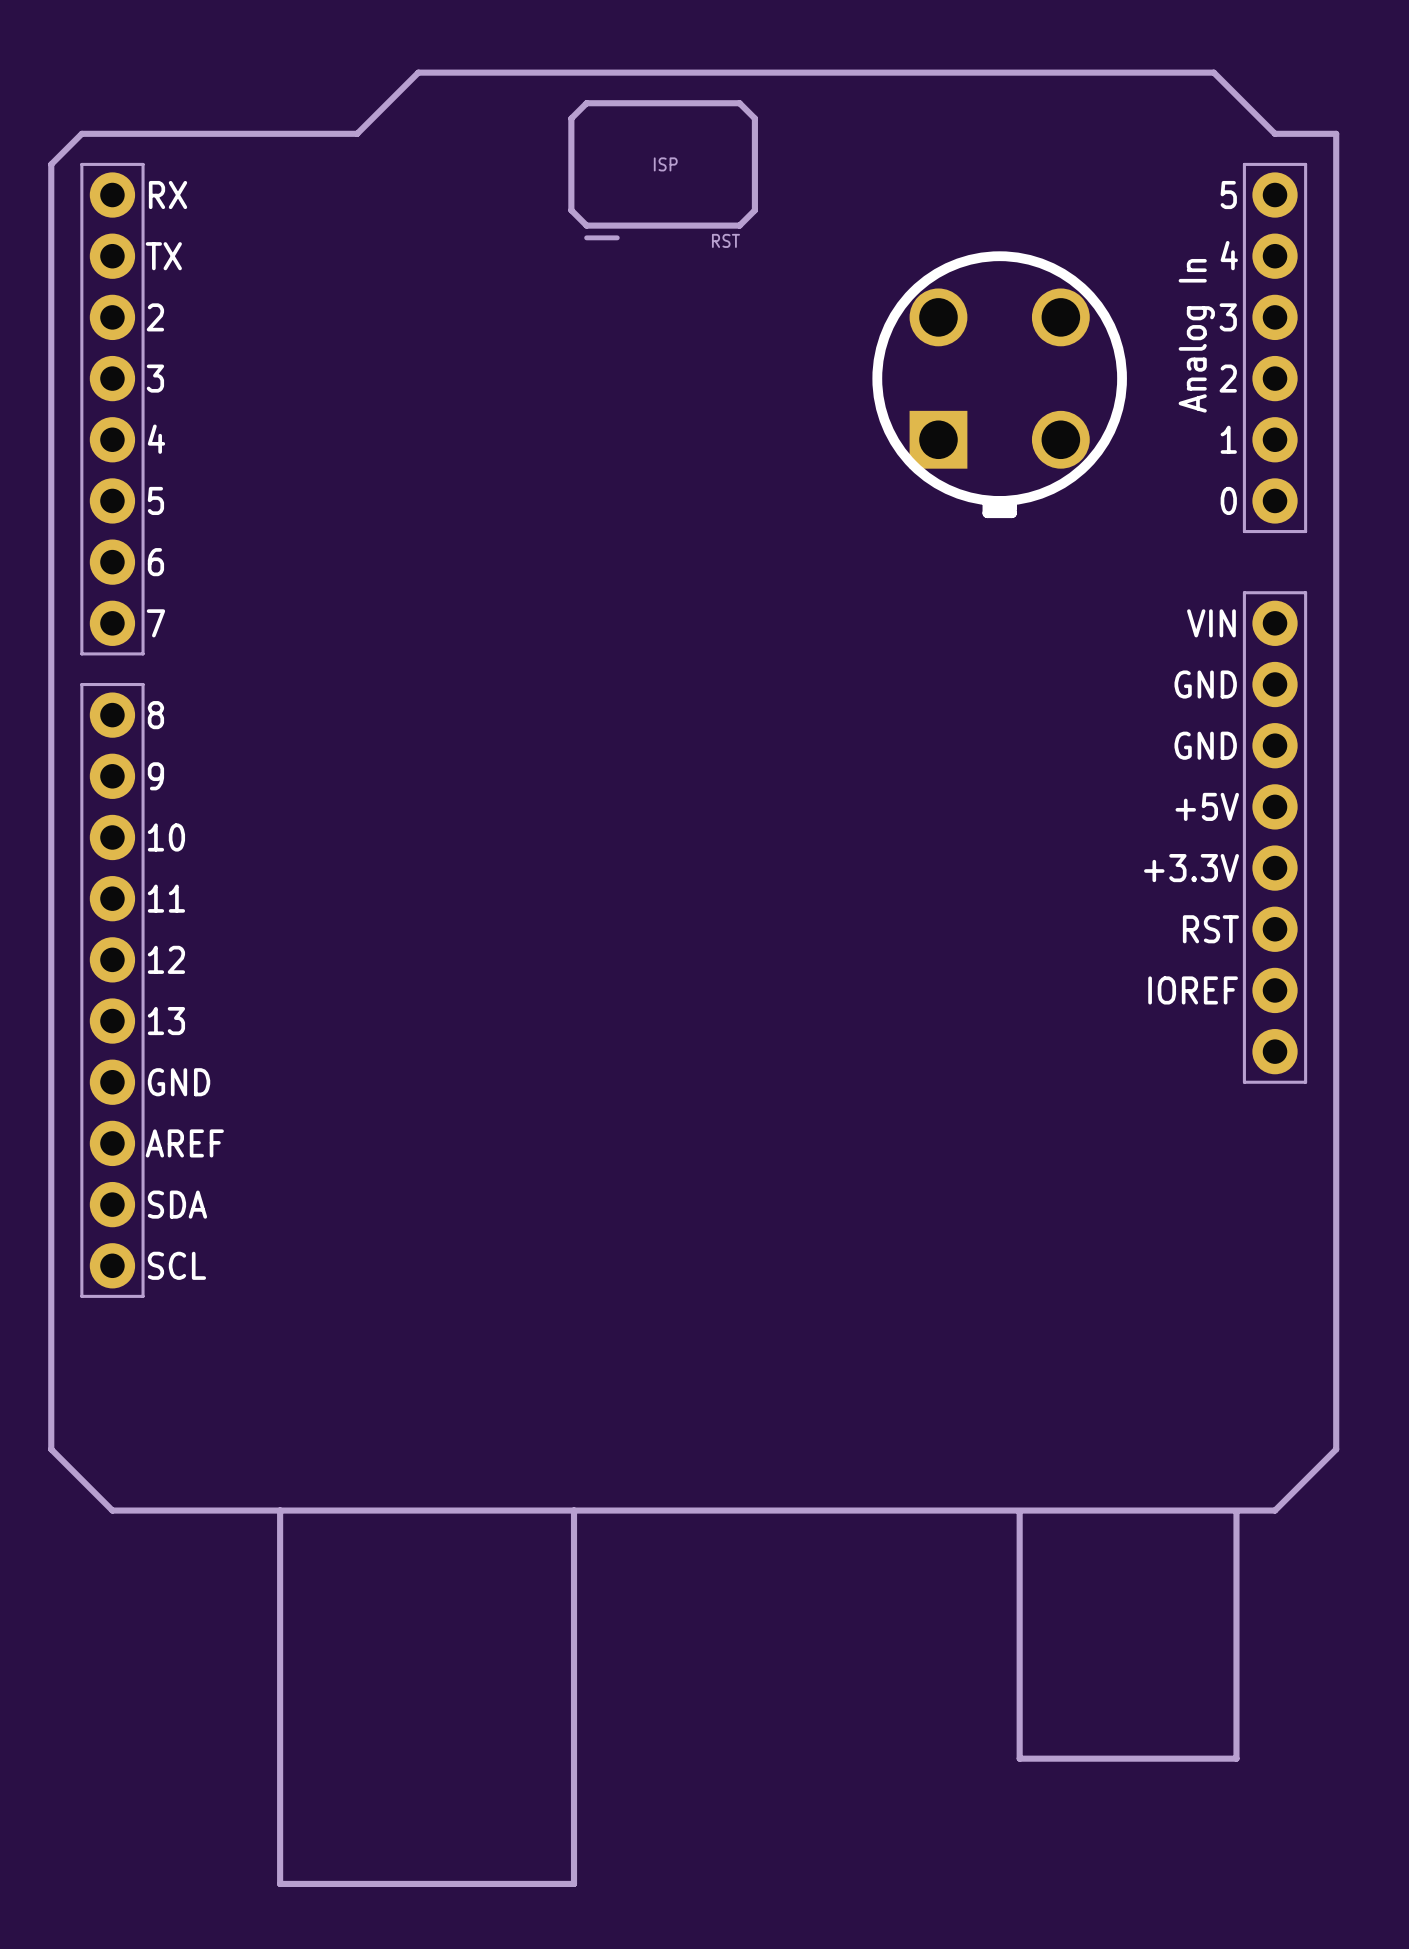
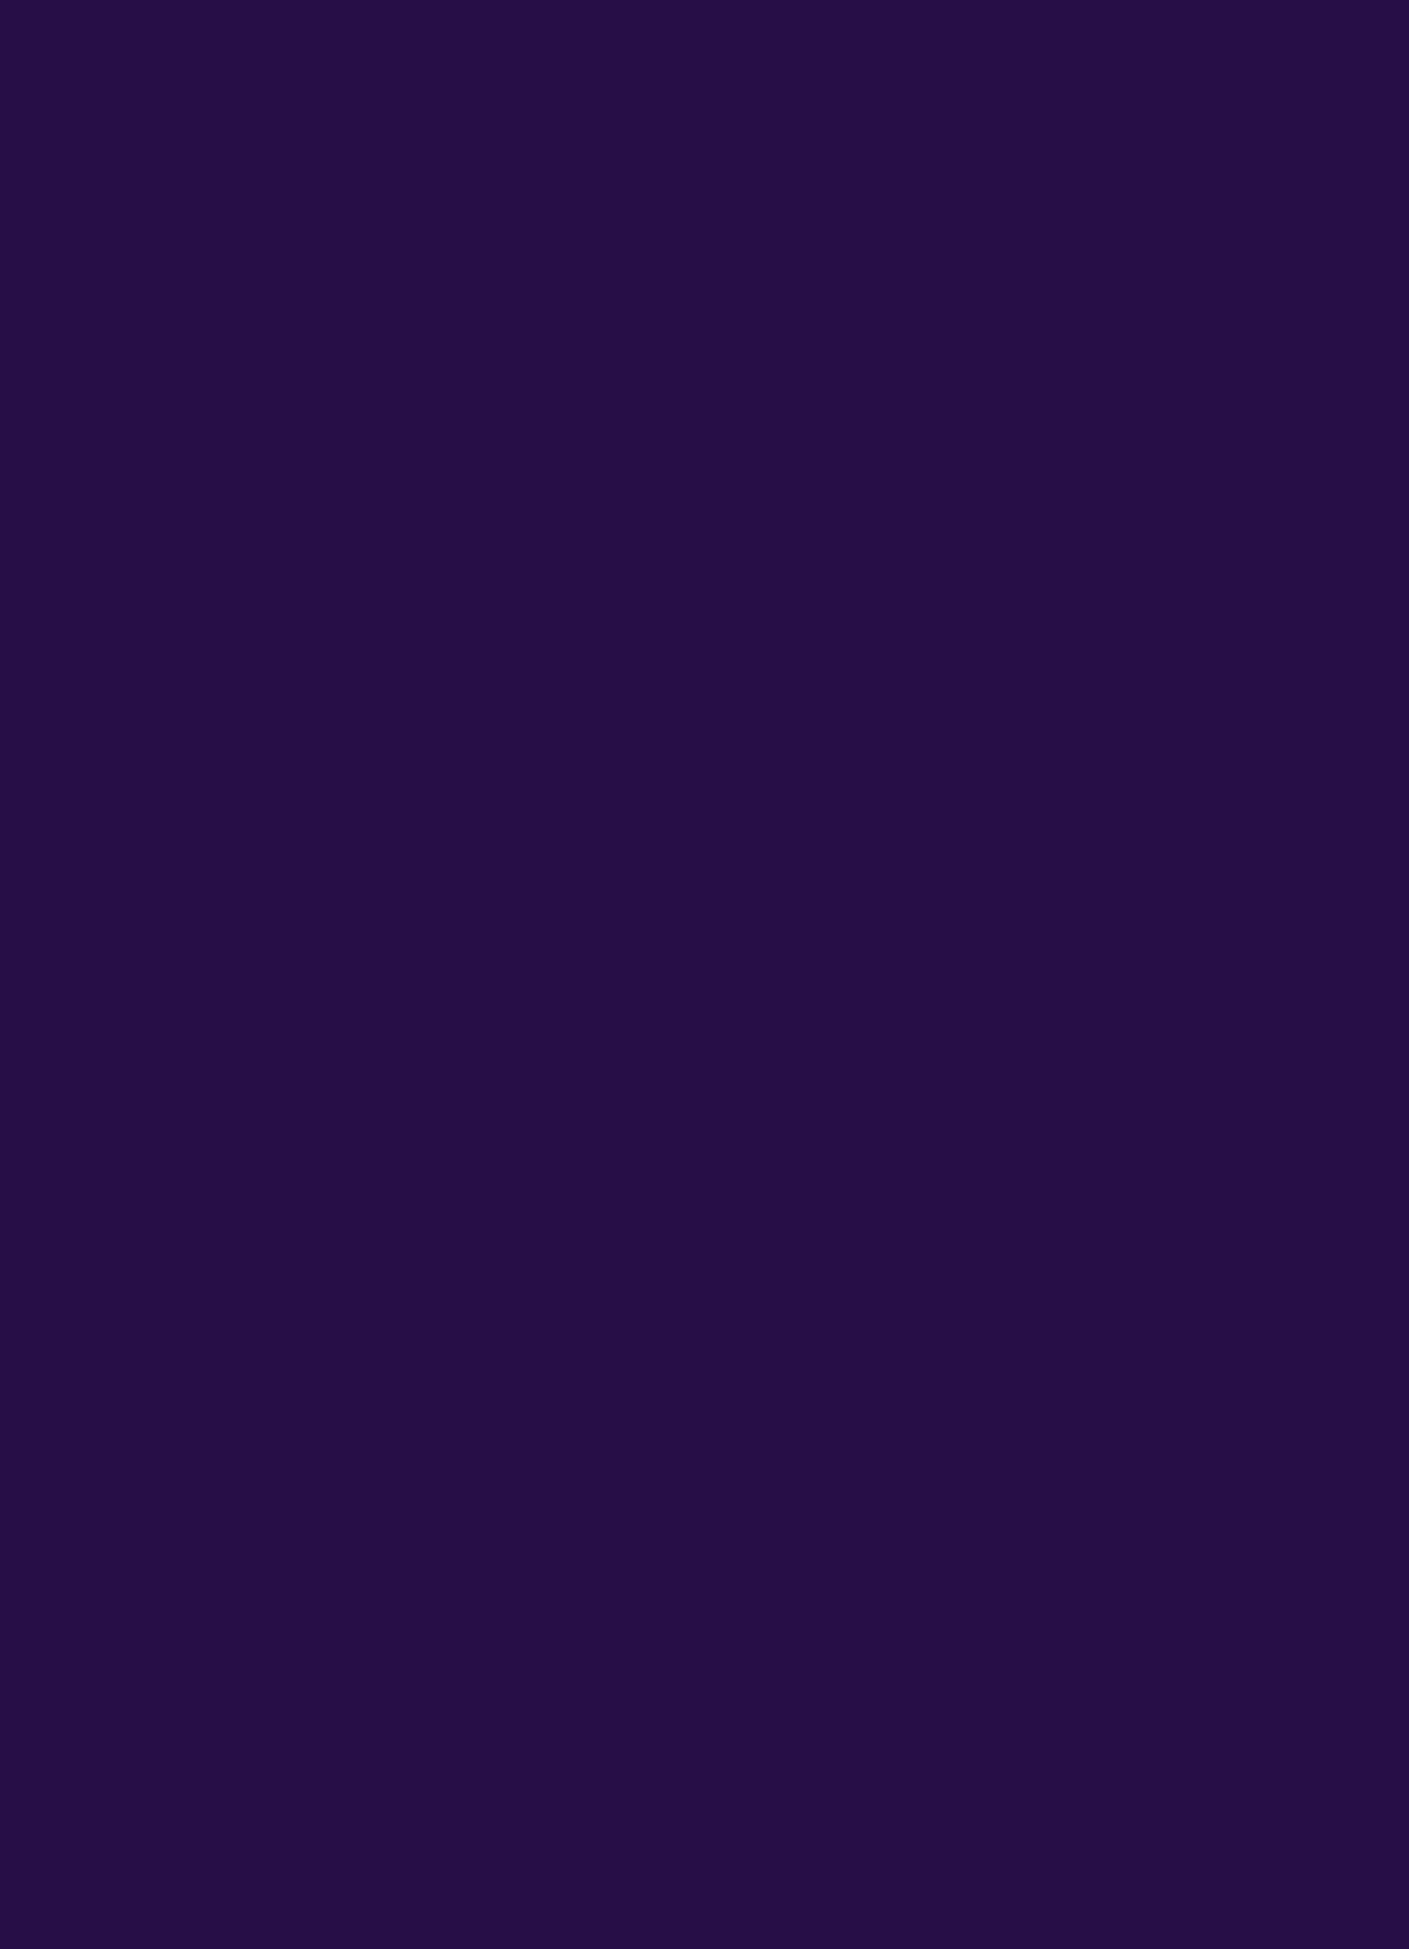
part: (999, 384) -> none
part: (693, 978) -> none

